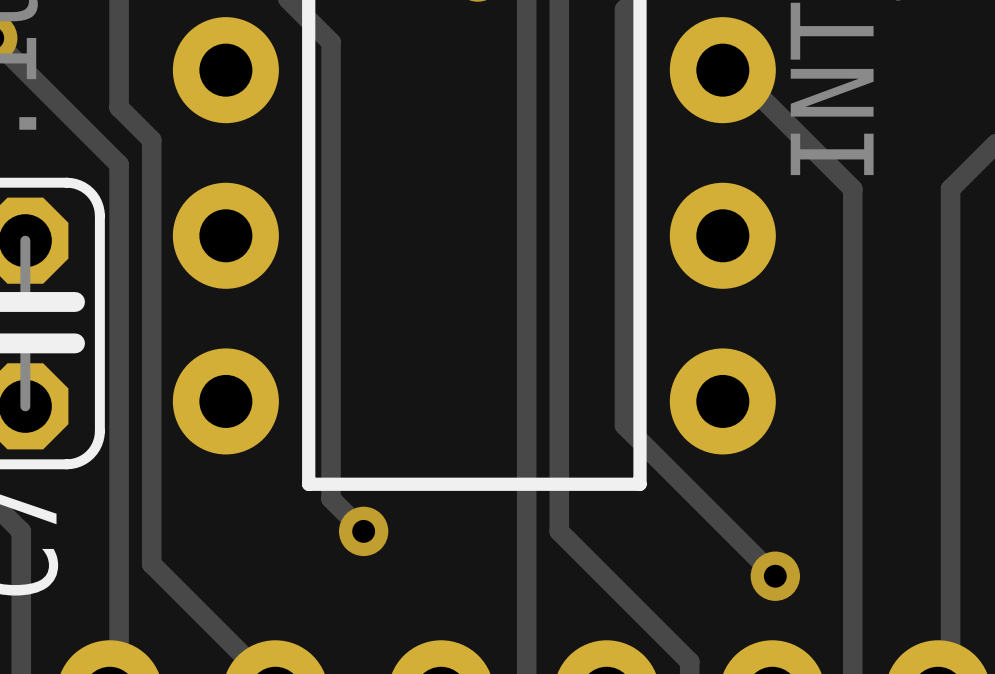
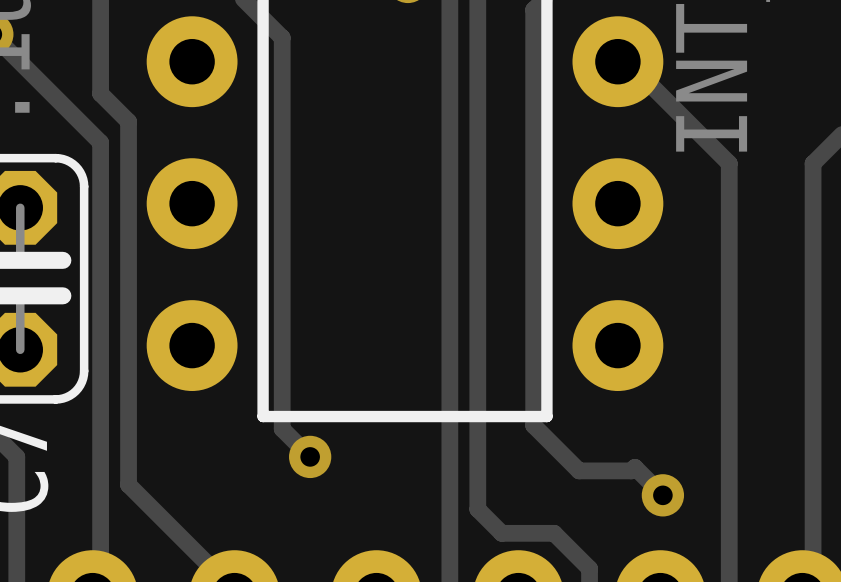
track: (624, 425) (742, 543) -> (533, 366) (533, 425) (579, 470) (631, 470) (634, 467)
track: (559, 531) (648, 620) -> (477, 456) (477, 509) (501, 533) (554, 533)

